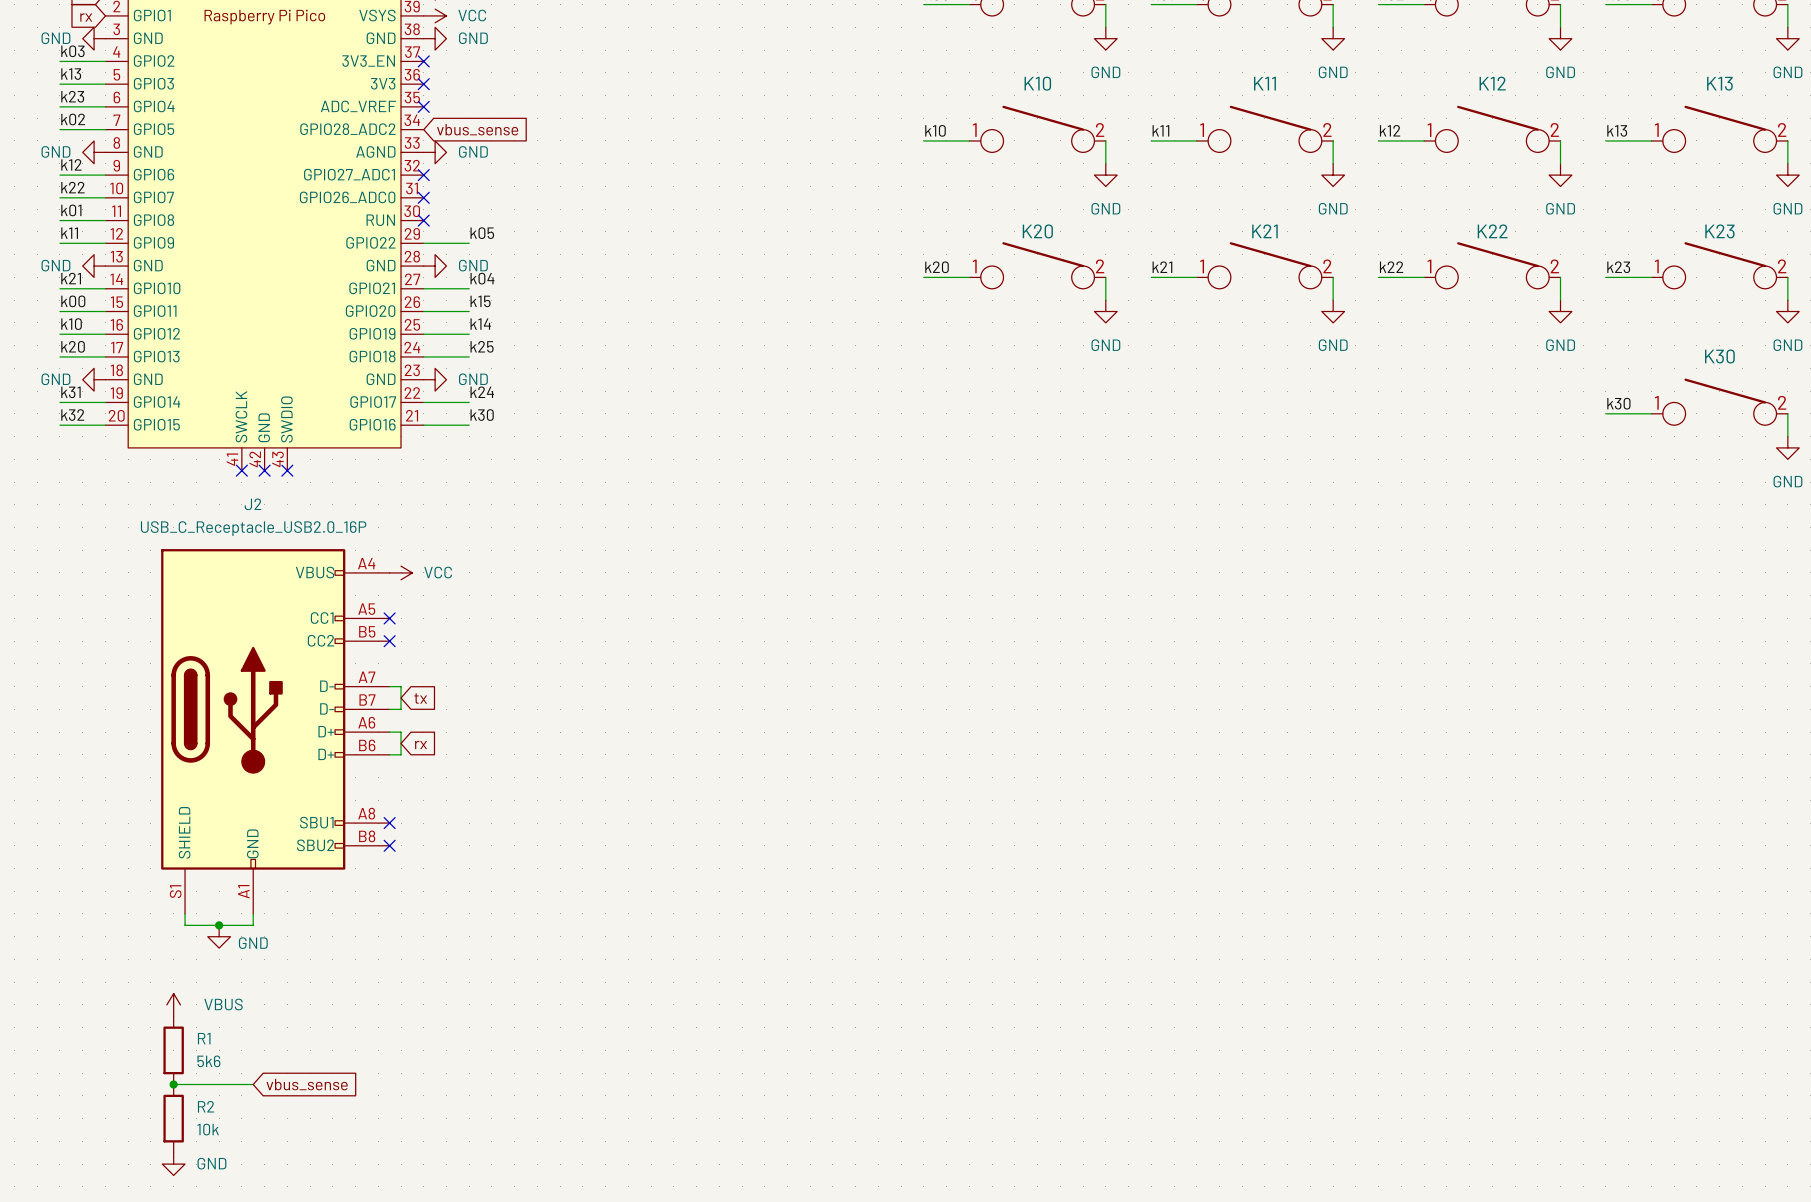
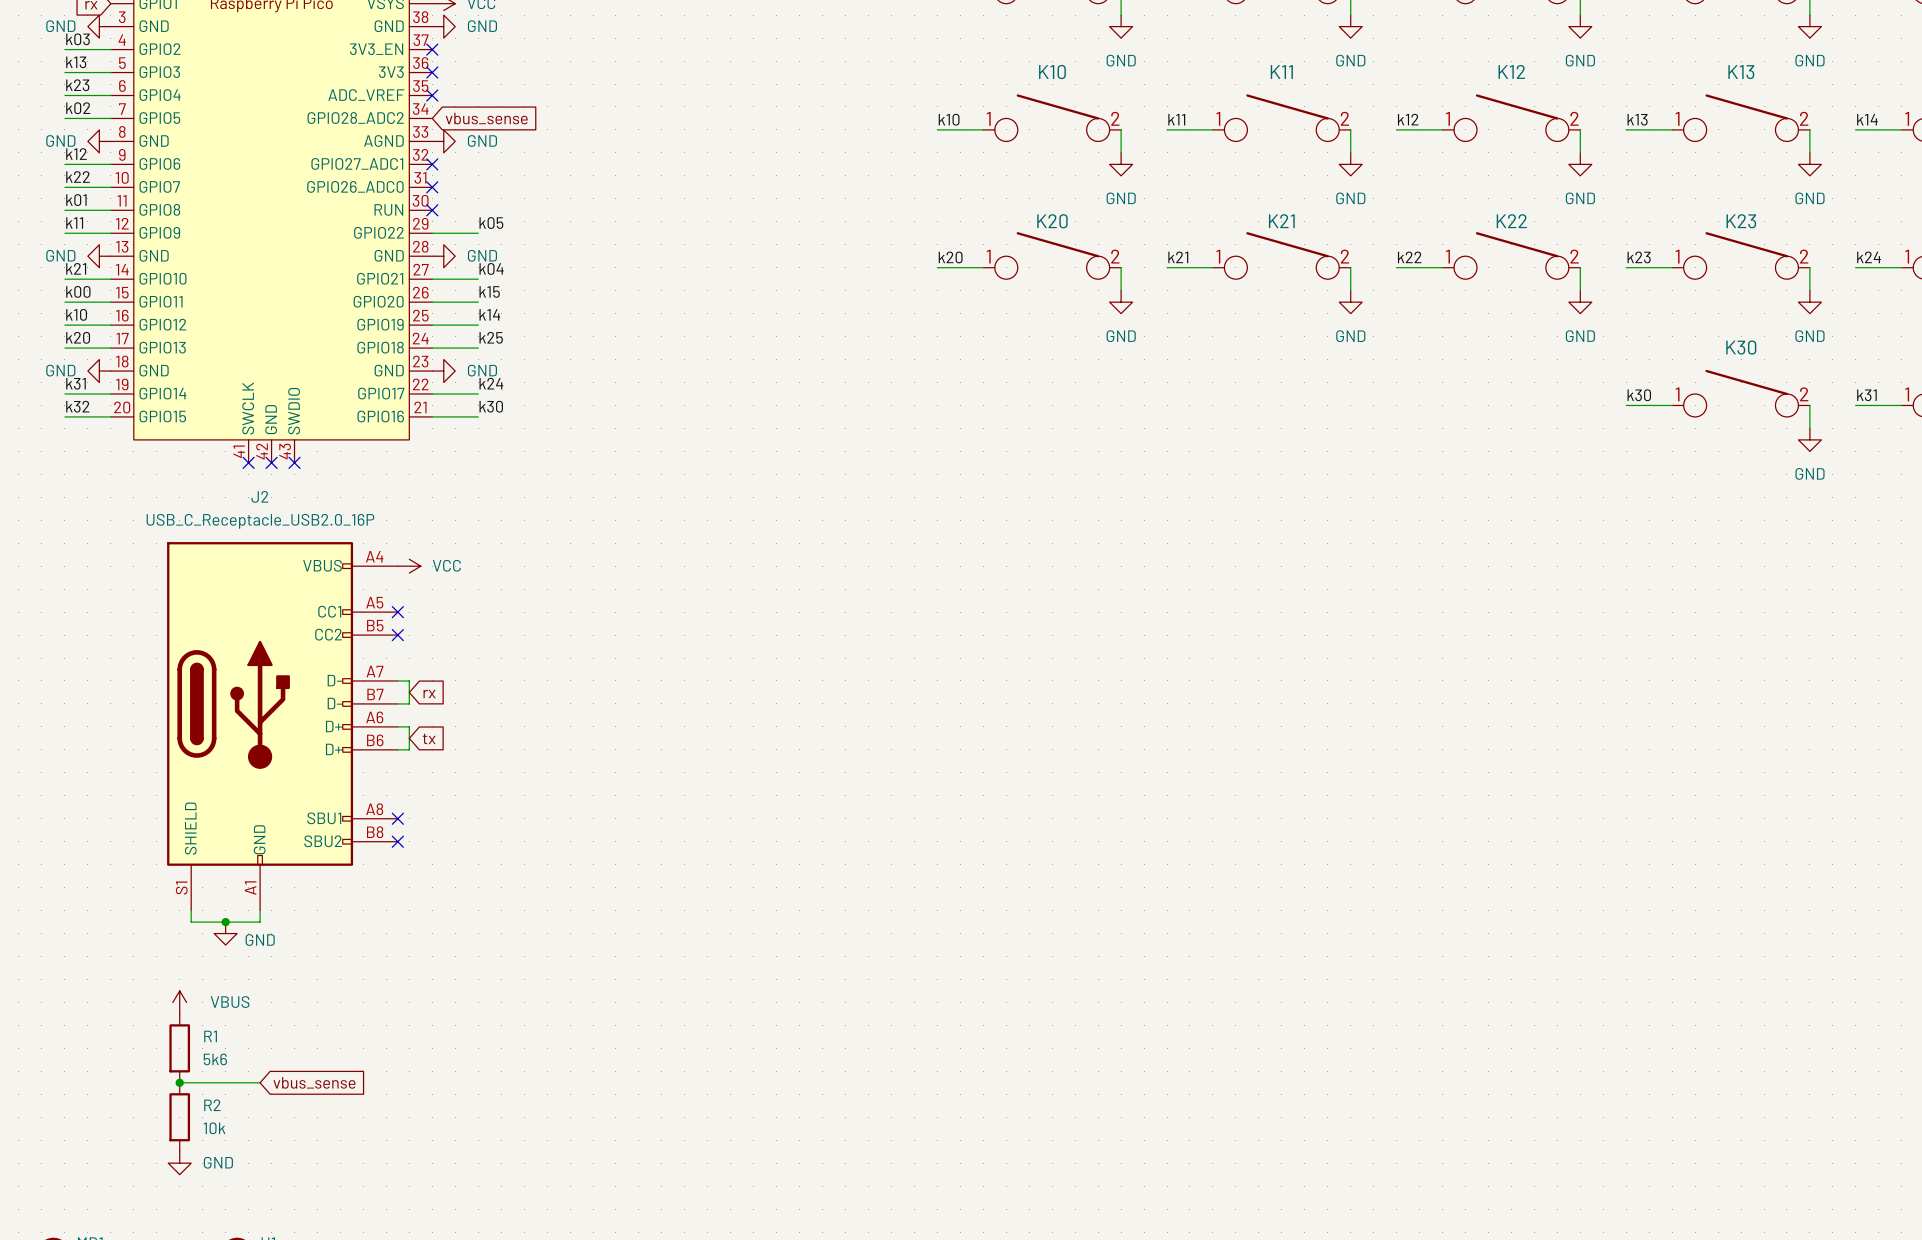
global label: tx (420, 698) -> rx (429, 694)
global label: rx (421, 745) -> tx (429, 738)

